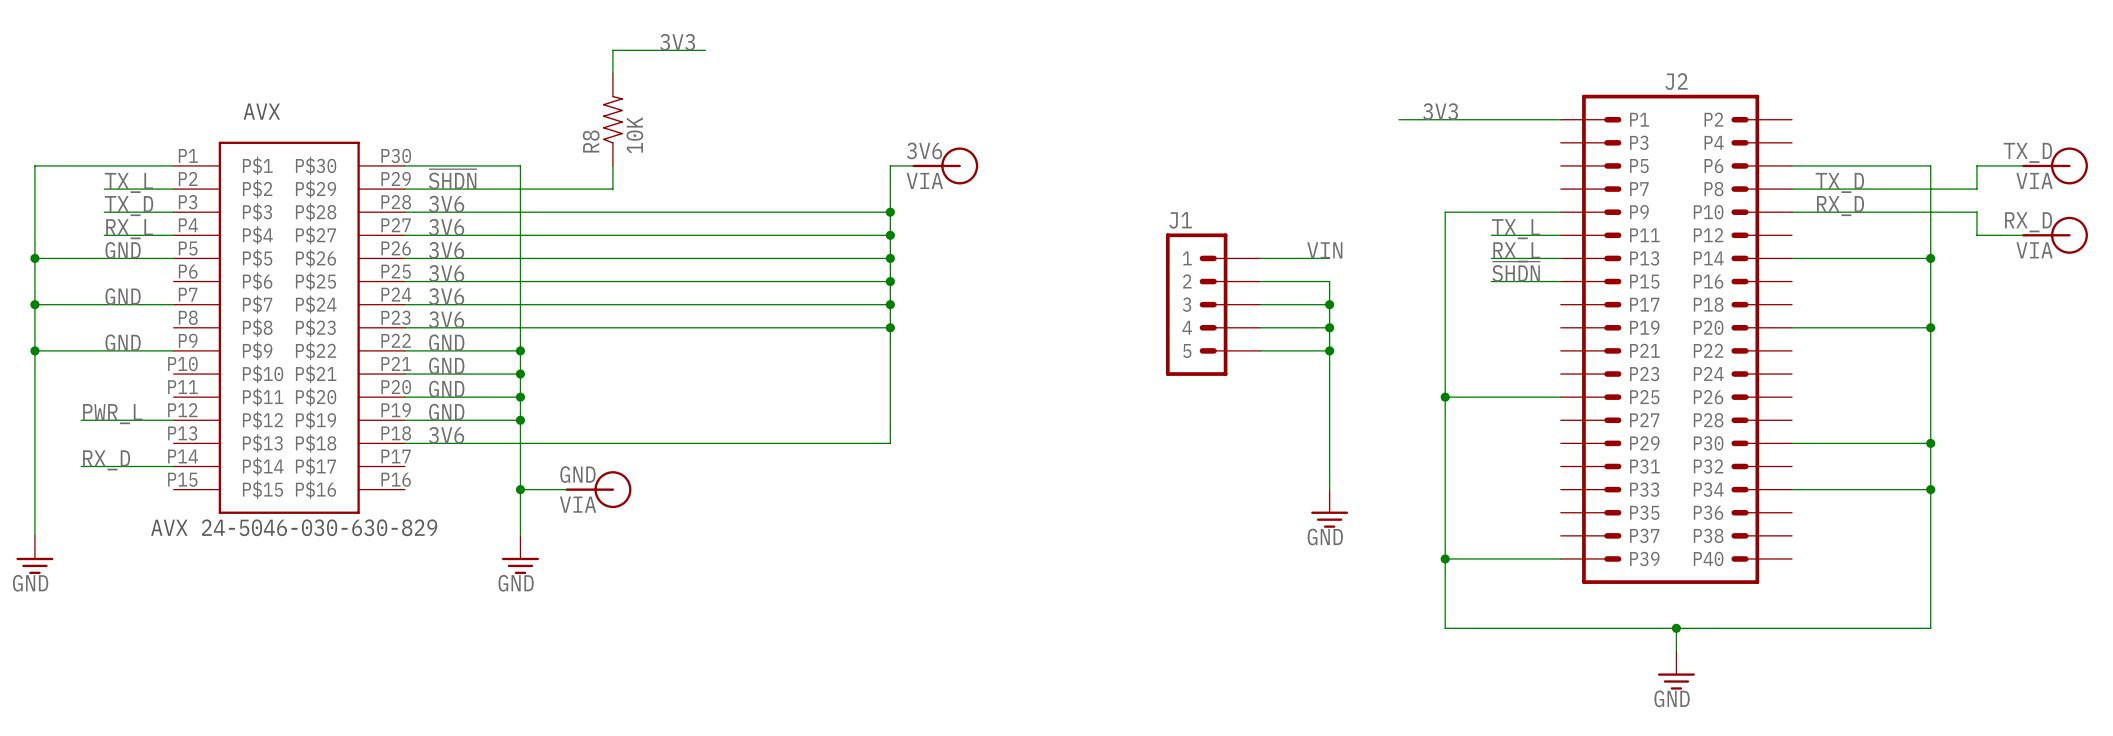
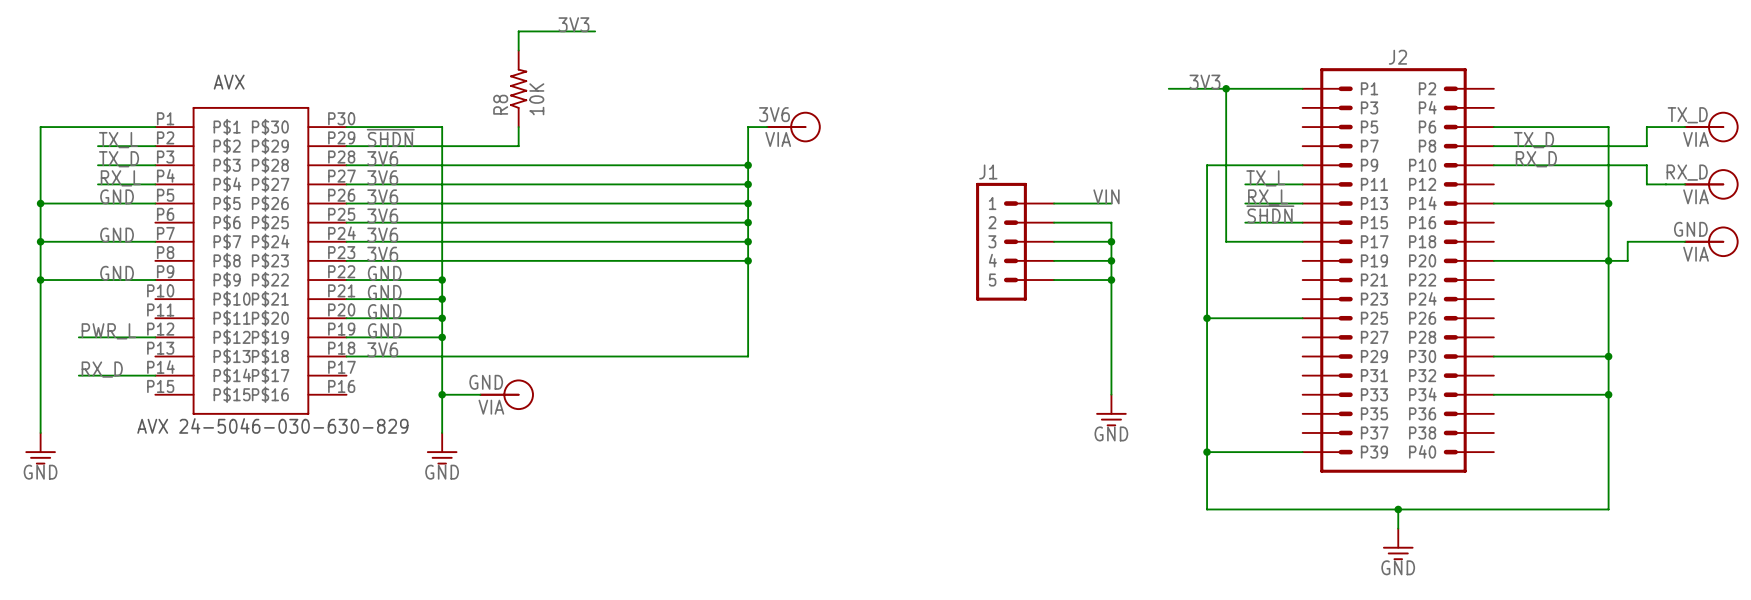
wire: none -> (1226, 88) (1226, 241) (1302, 241)
junction: none -> (1226, 88)
wire: none -> (1685, 241) (1627, 241) (1627, 260) (1608, 260)
part: none -> GND (1711, 241)

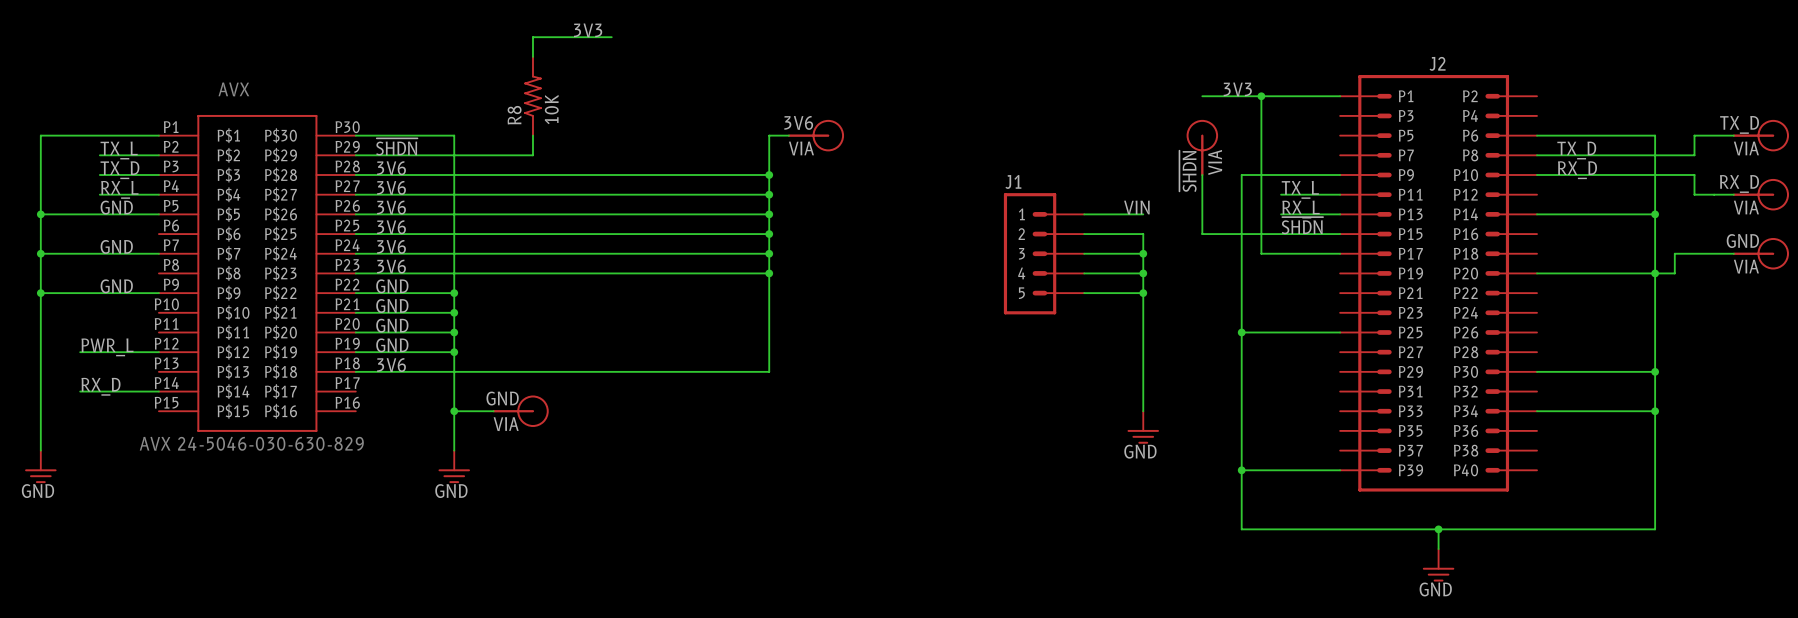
part: none -> ~{SHDN} (1202, 147)
wire: none -> (1202, 175) (1202, 234) (1281, 234)

